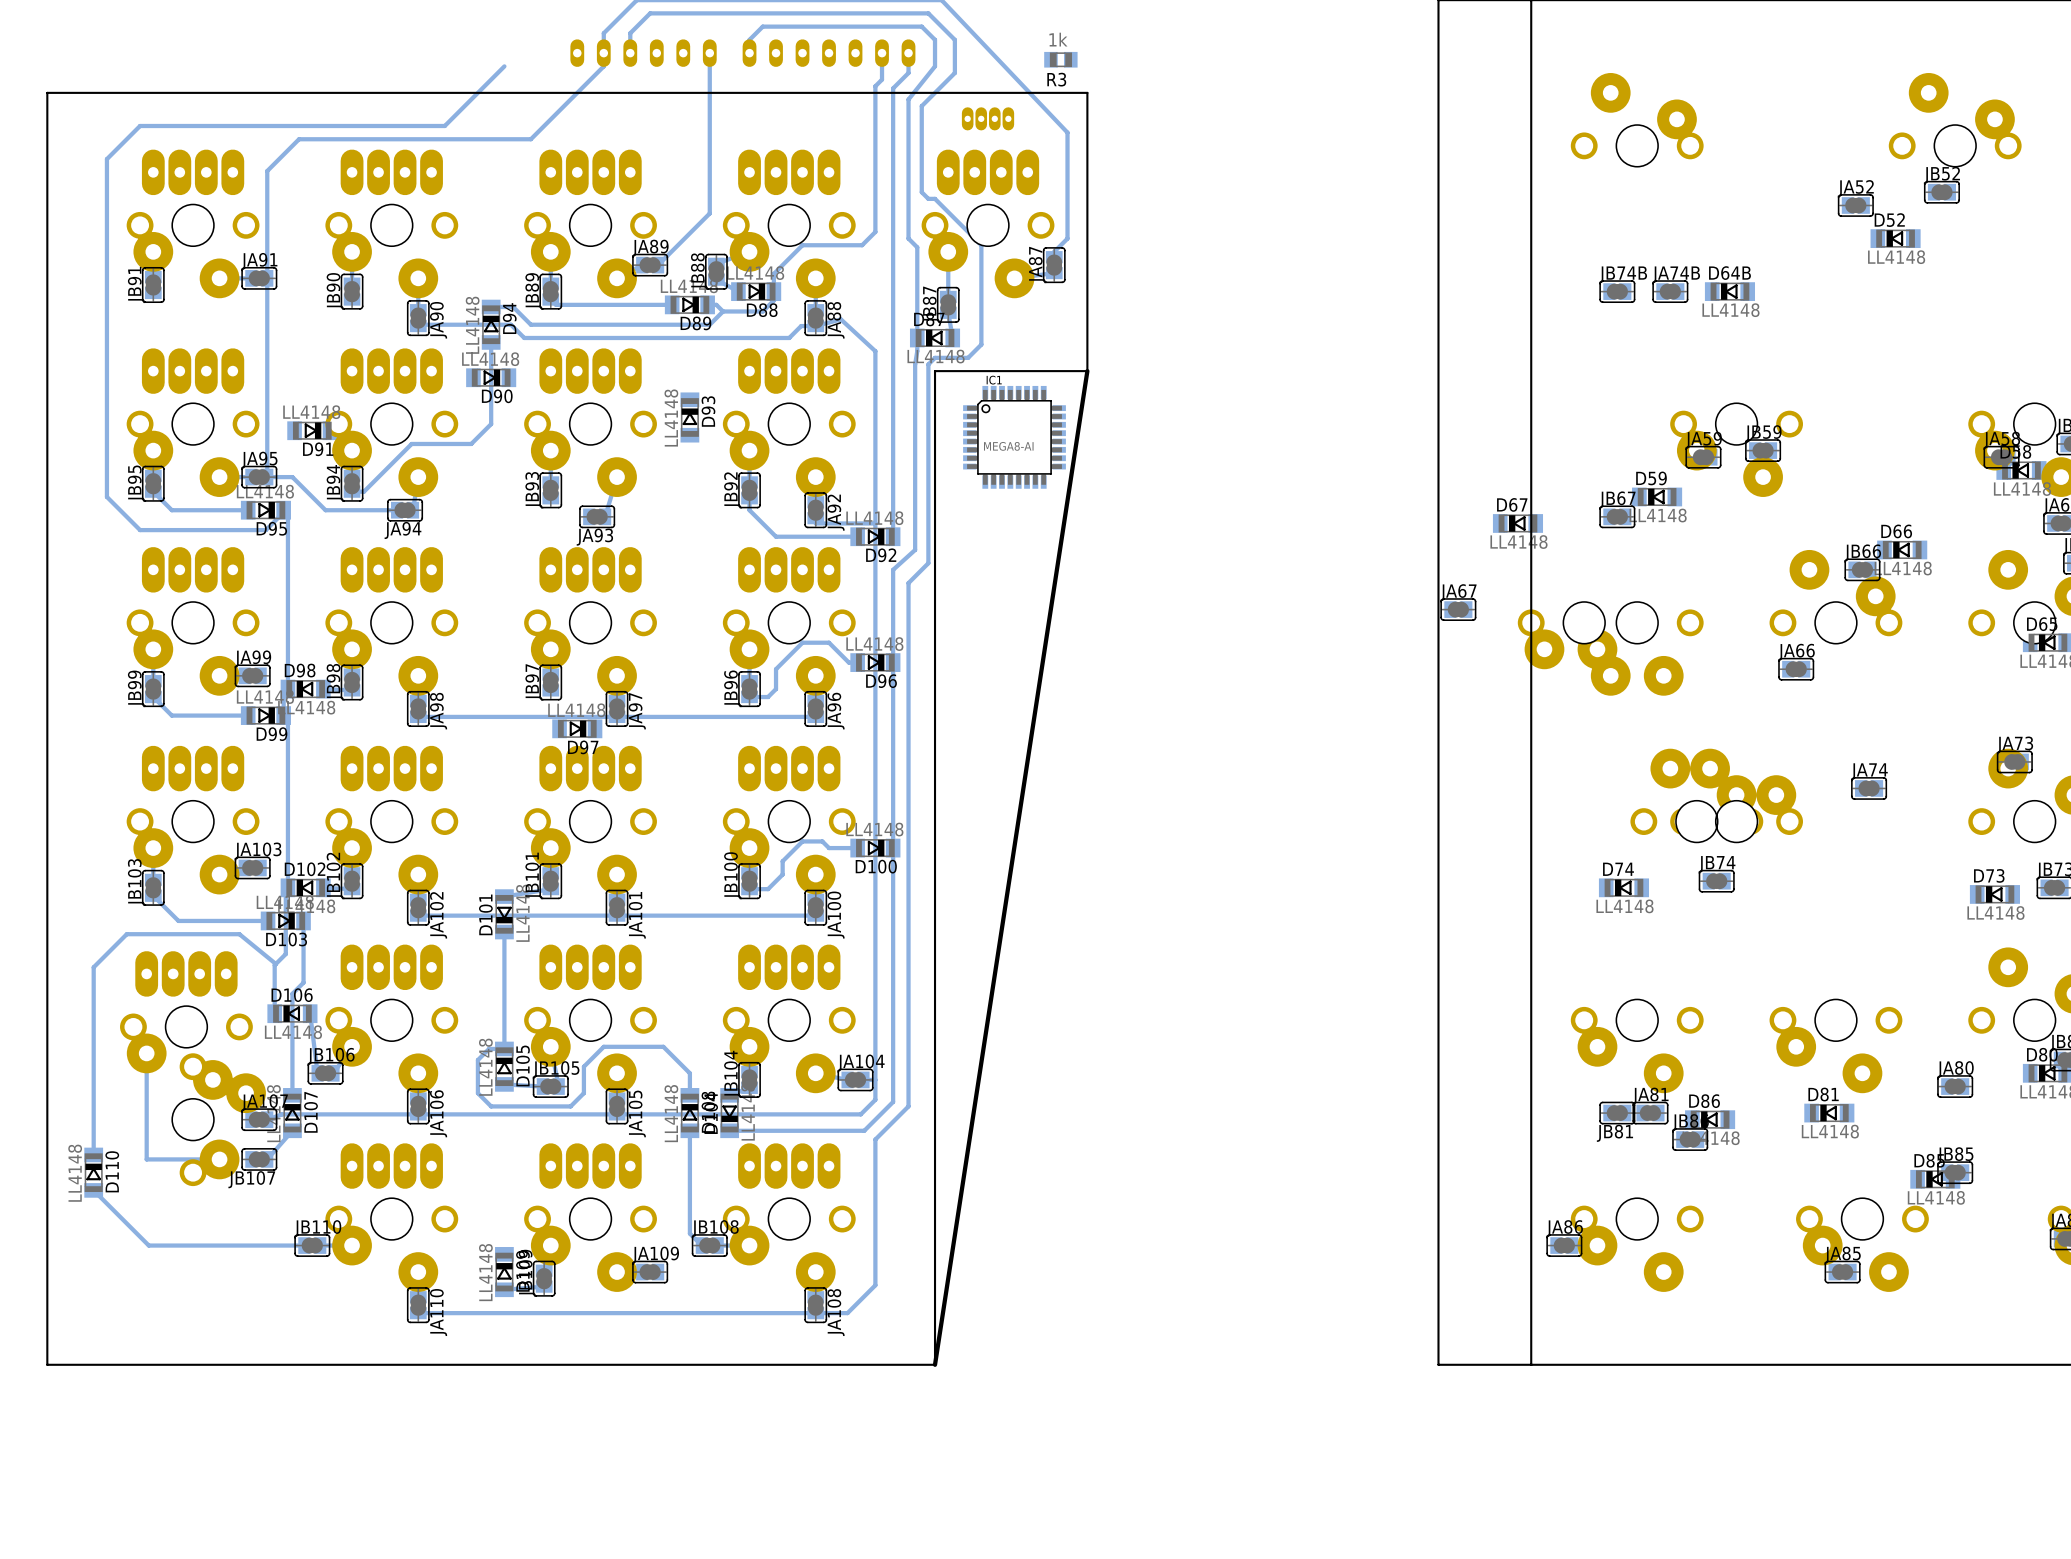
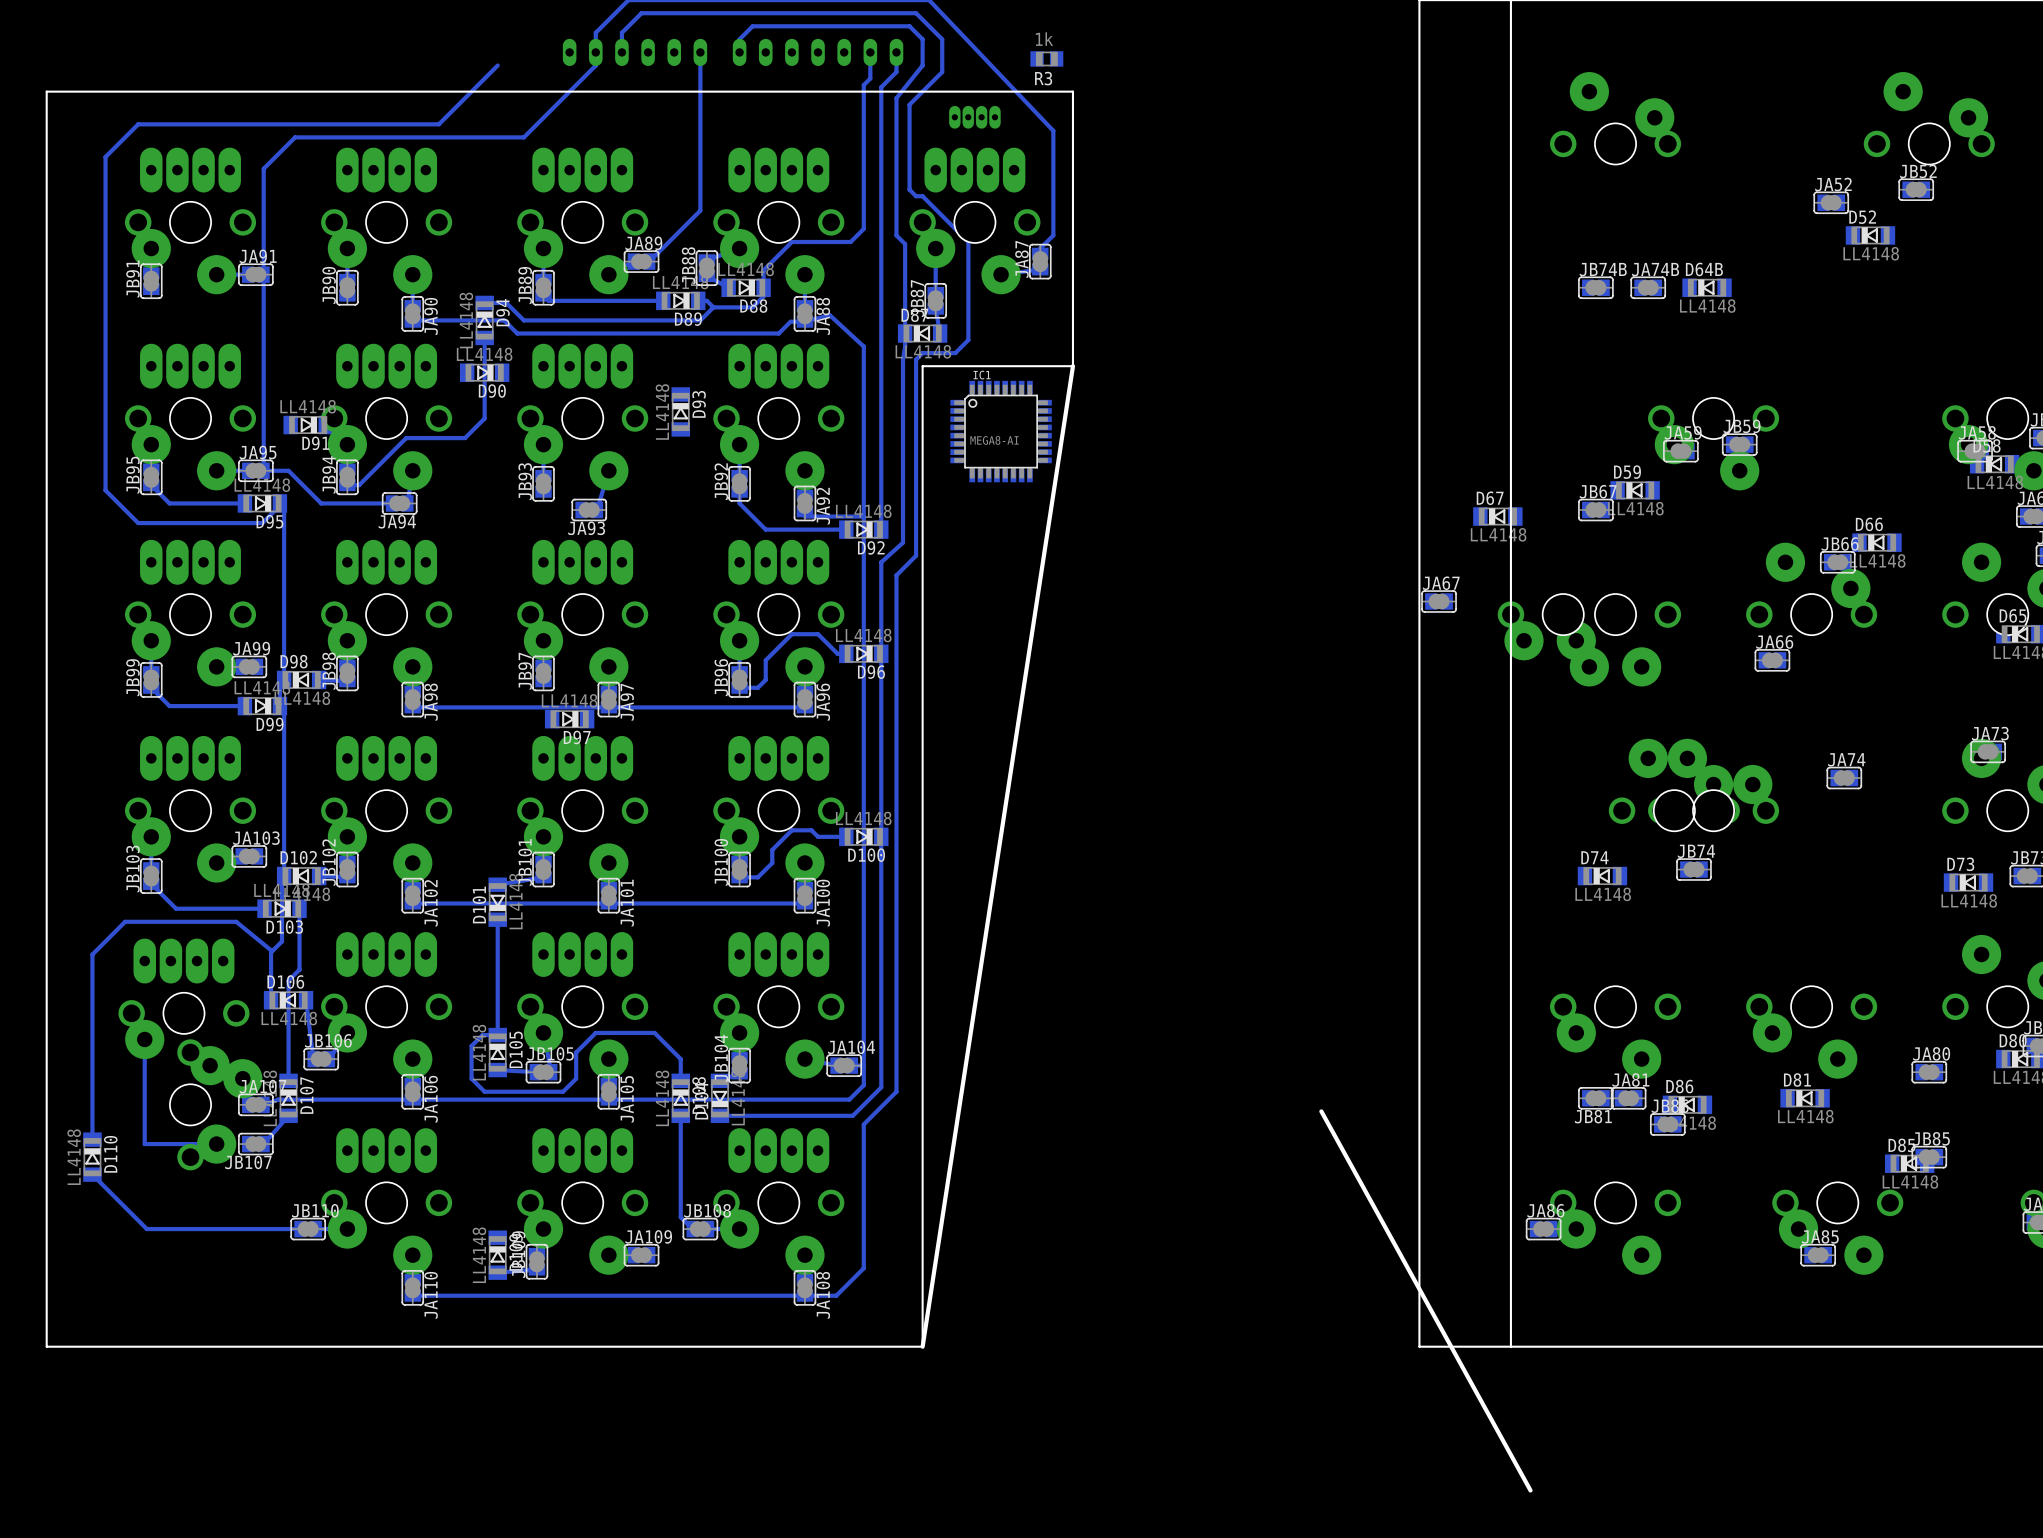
board edge: none -> (1321, 1111) (1530, 1490)

